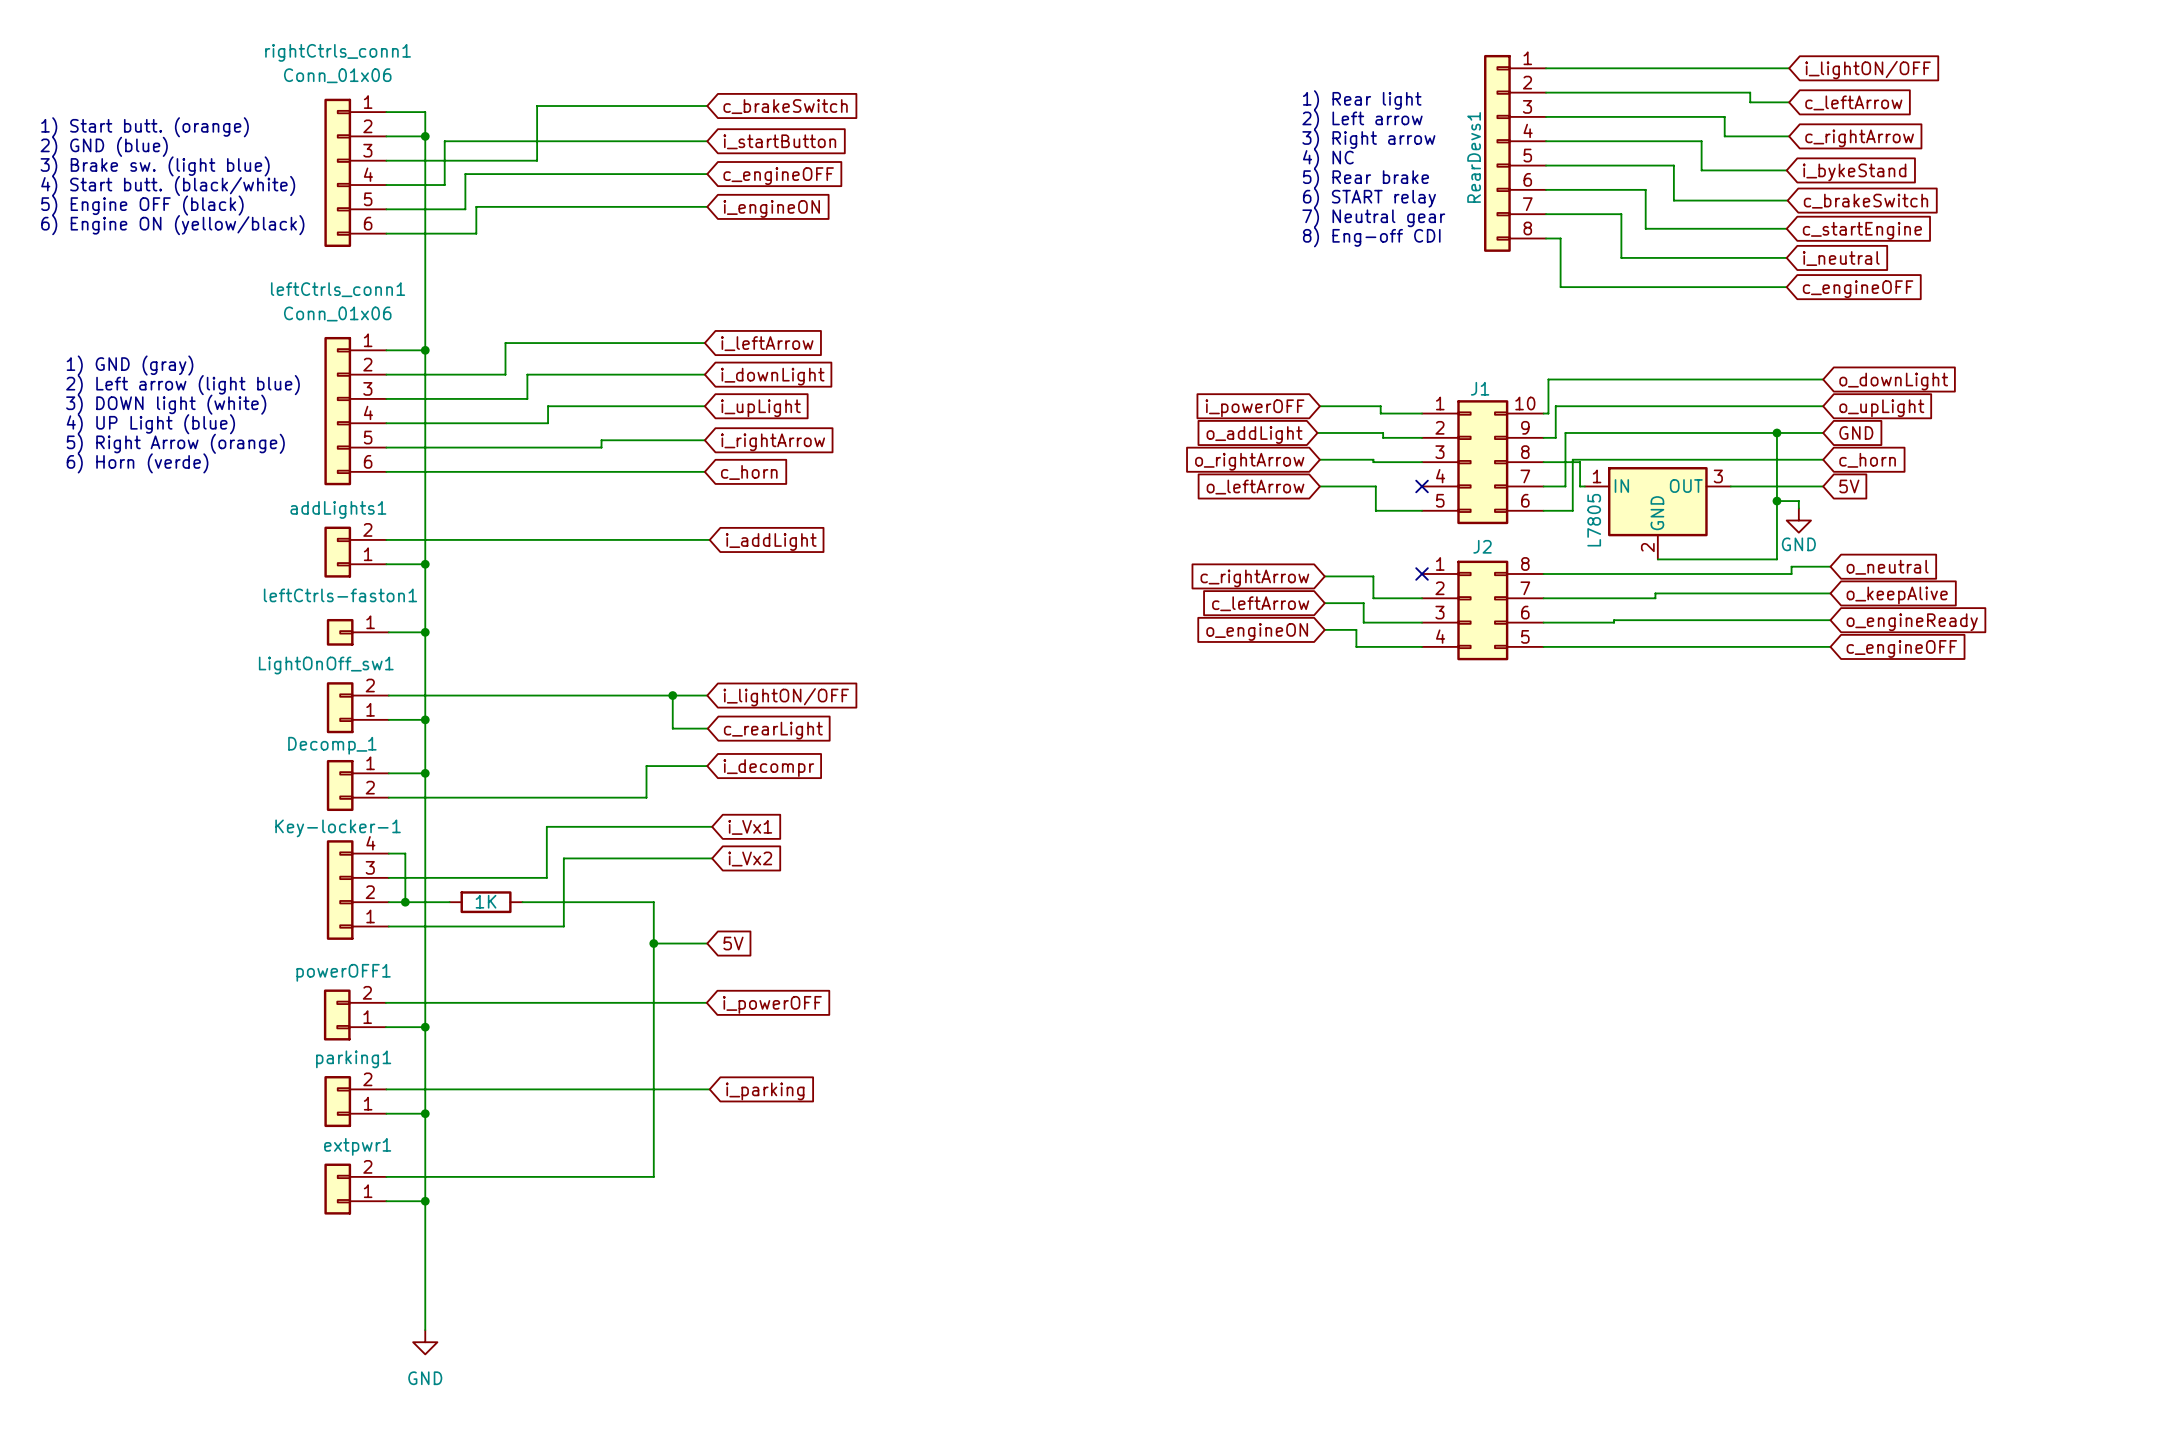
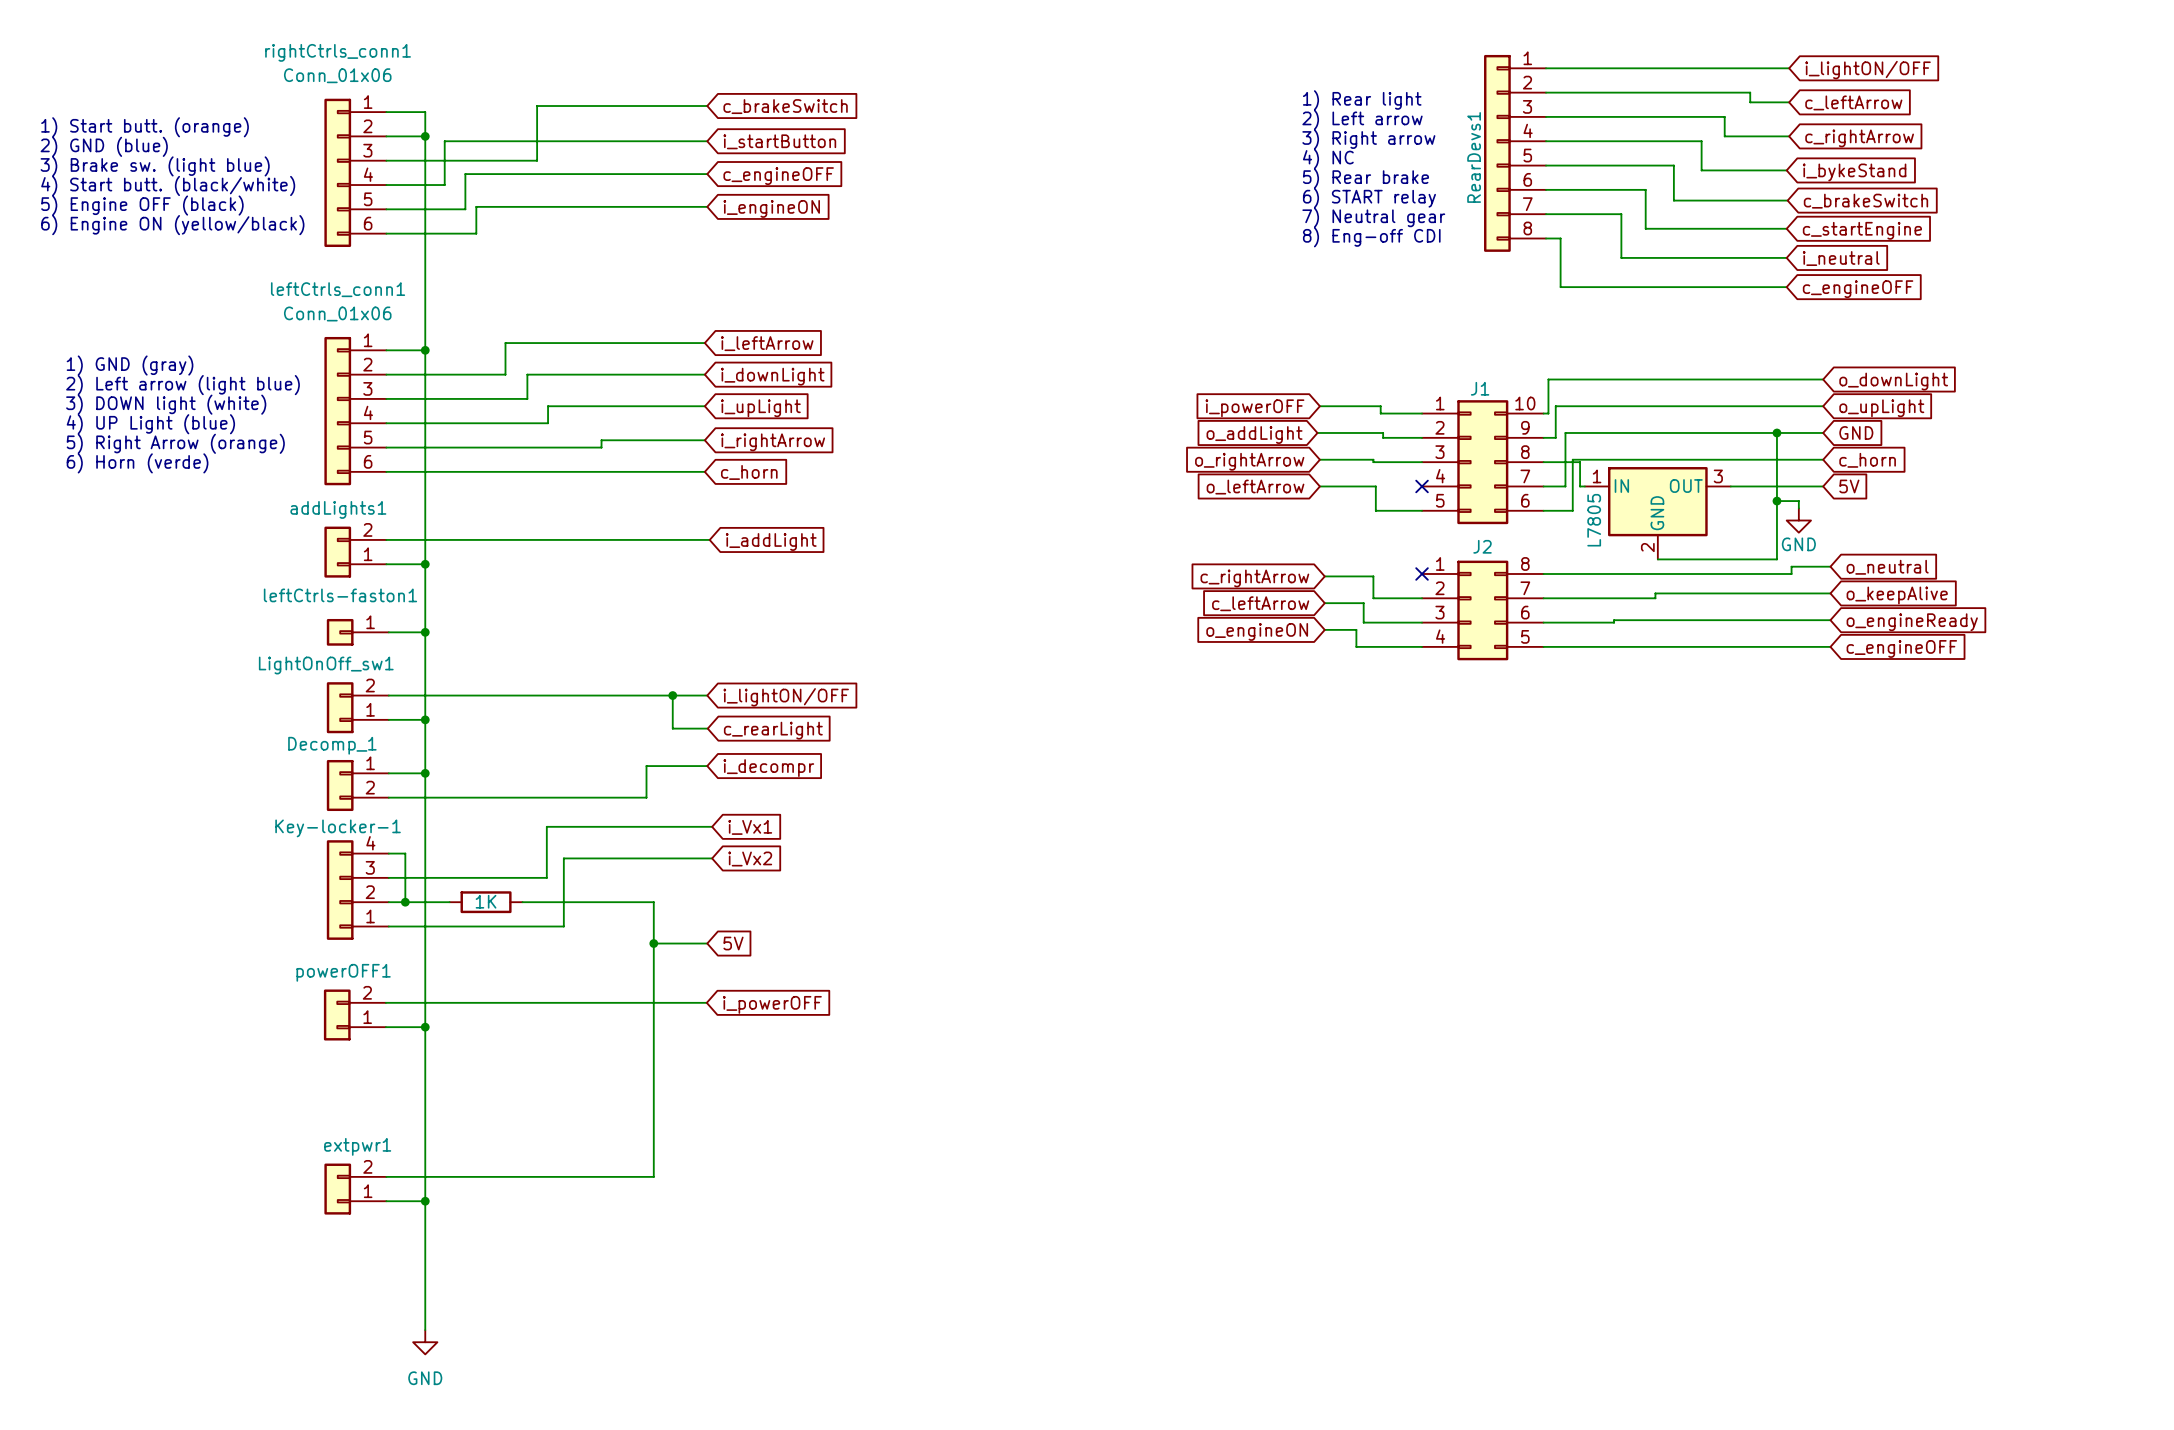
wire: (386, 1089) (709, 1089) -> none
global label: i_parking (765, 1091) -> none
parking1: (355, 1101) -> none
wire: (386, 1113) (425, 1113) -> none
junction: (425, 1113) -> none

